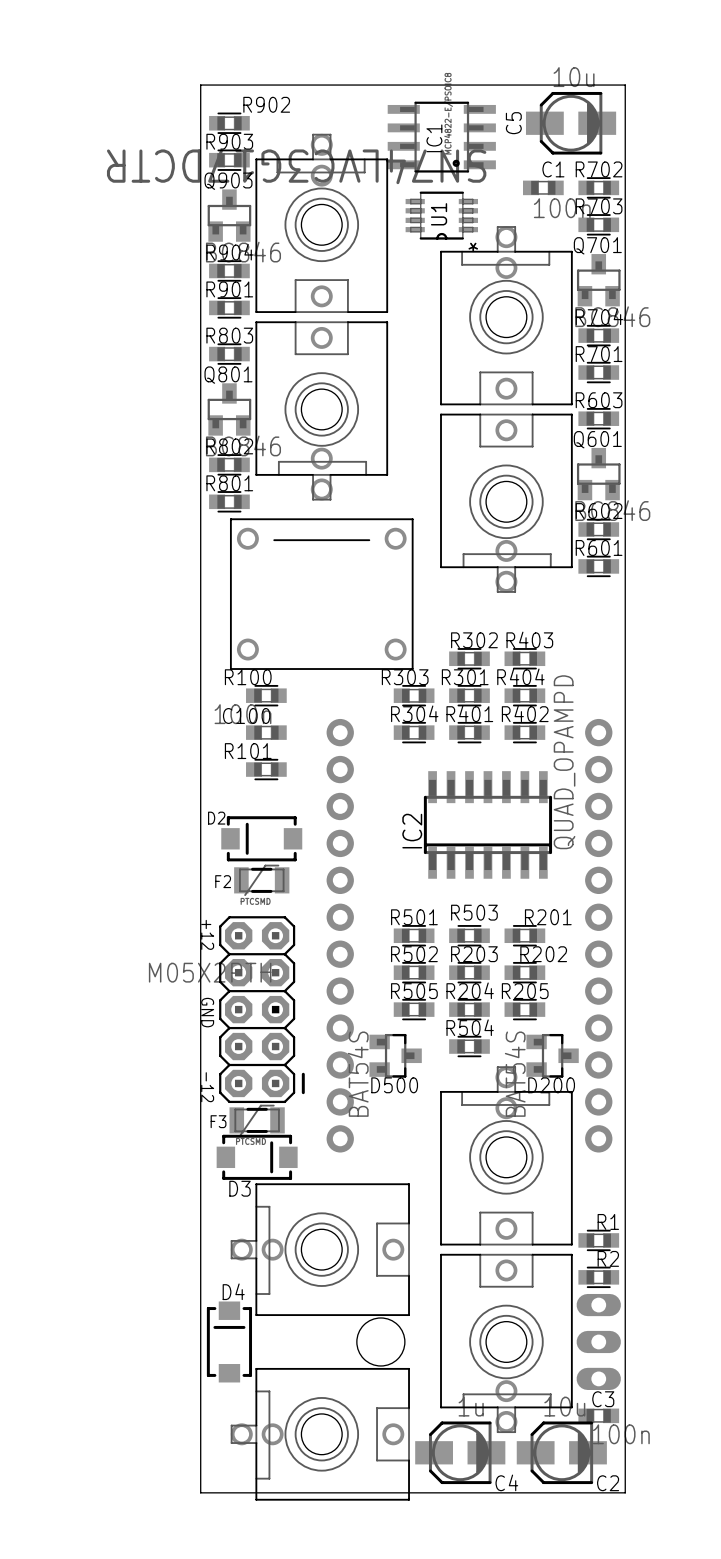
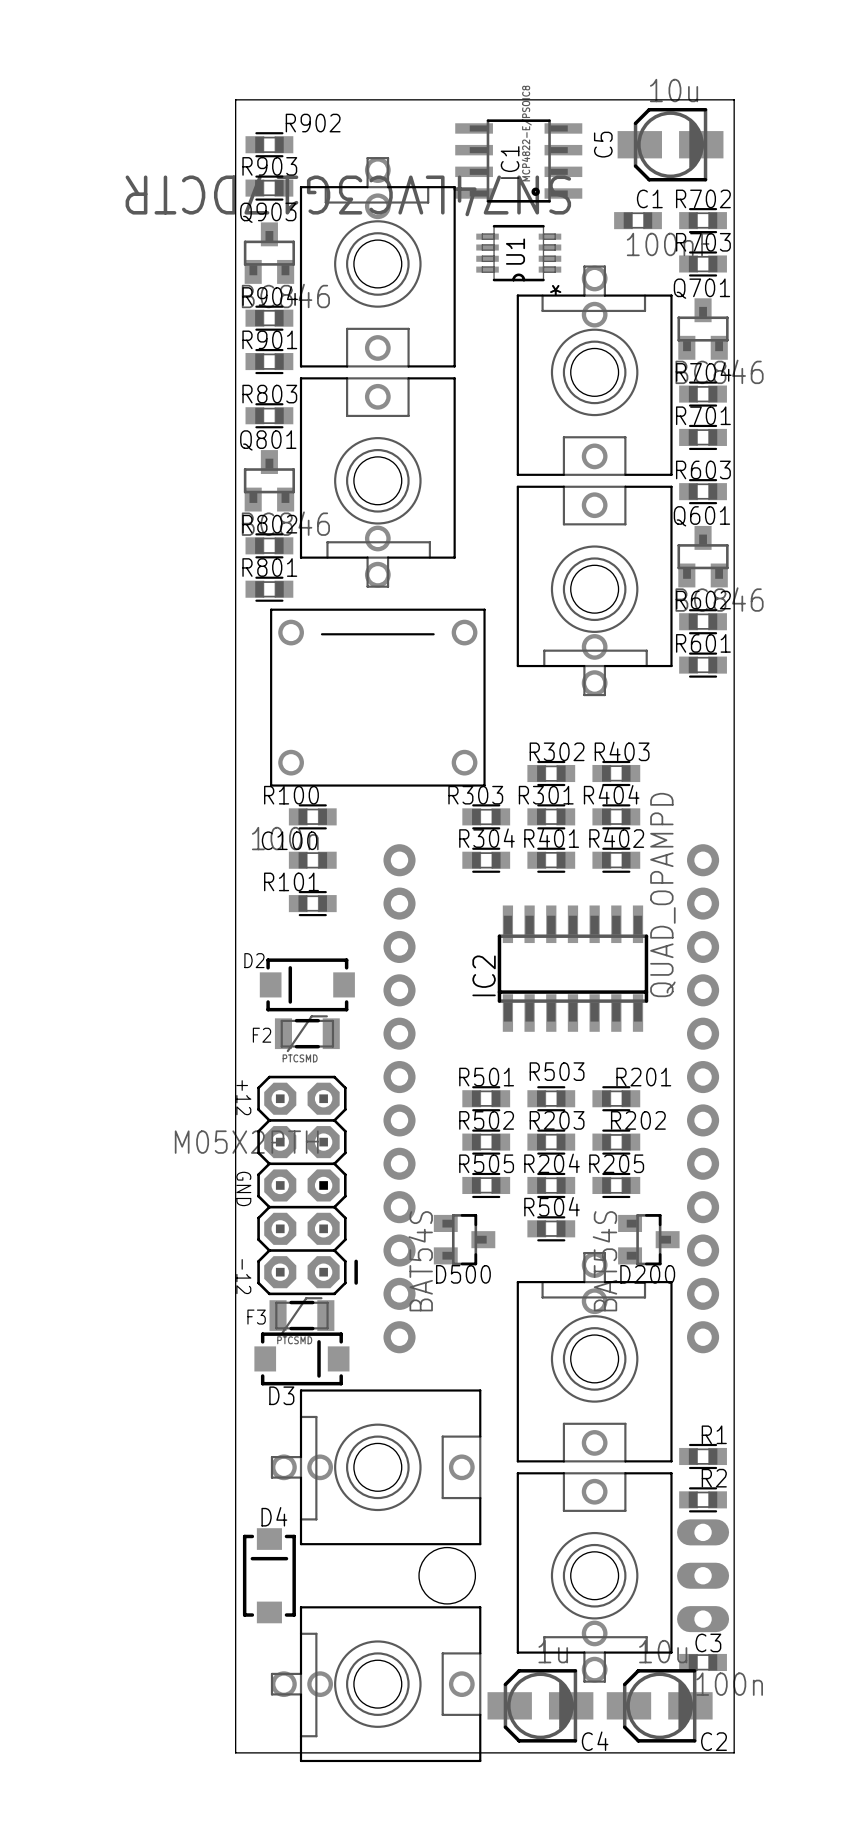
C1 value: 100n (562, 208) -> 100nF (669, 244)

